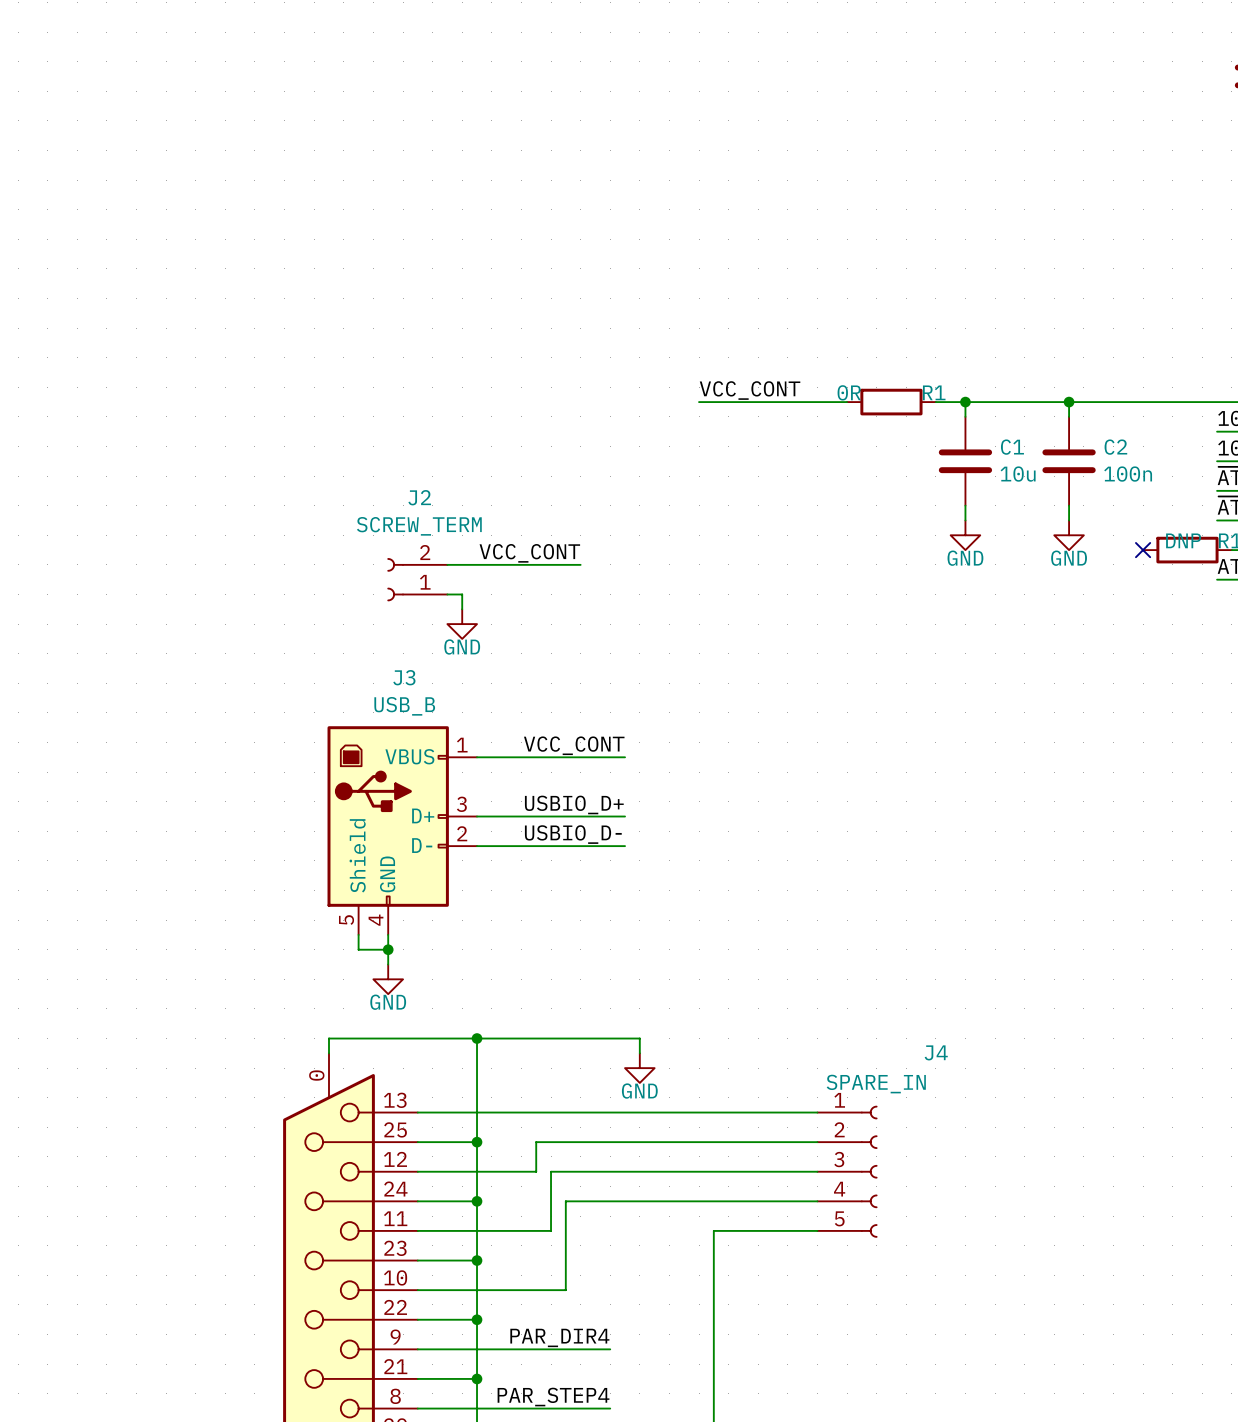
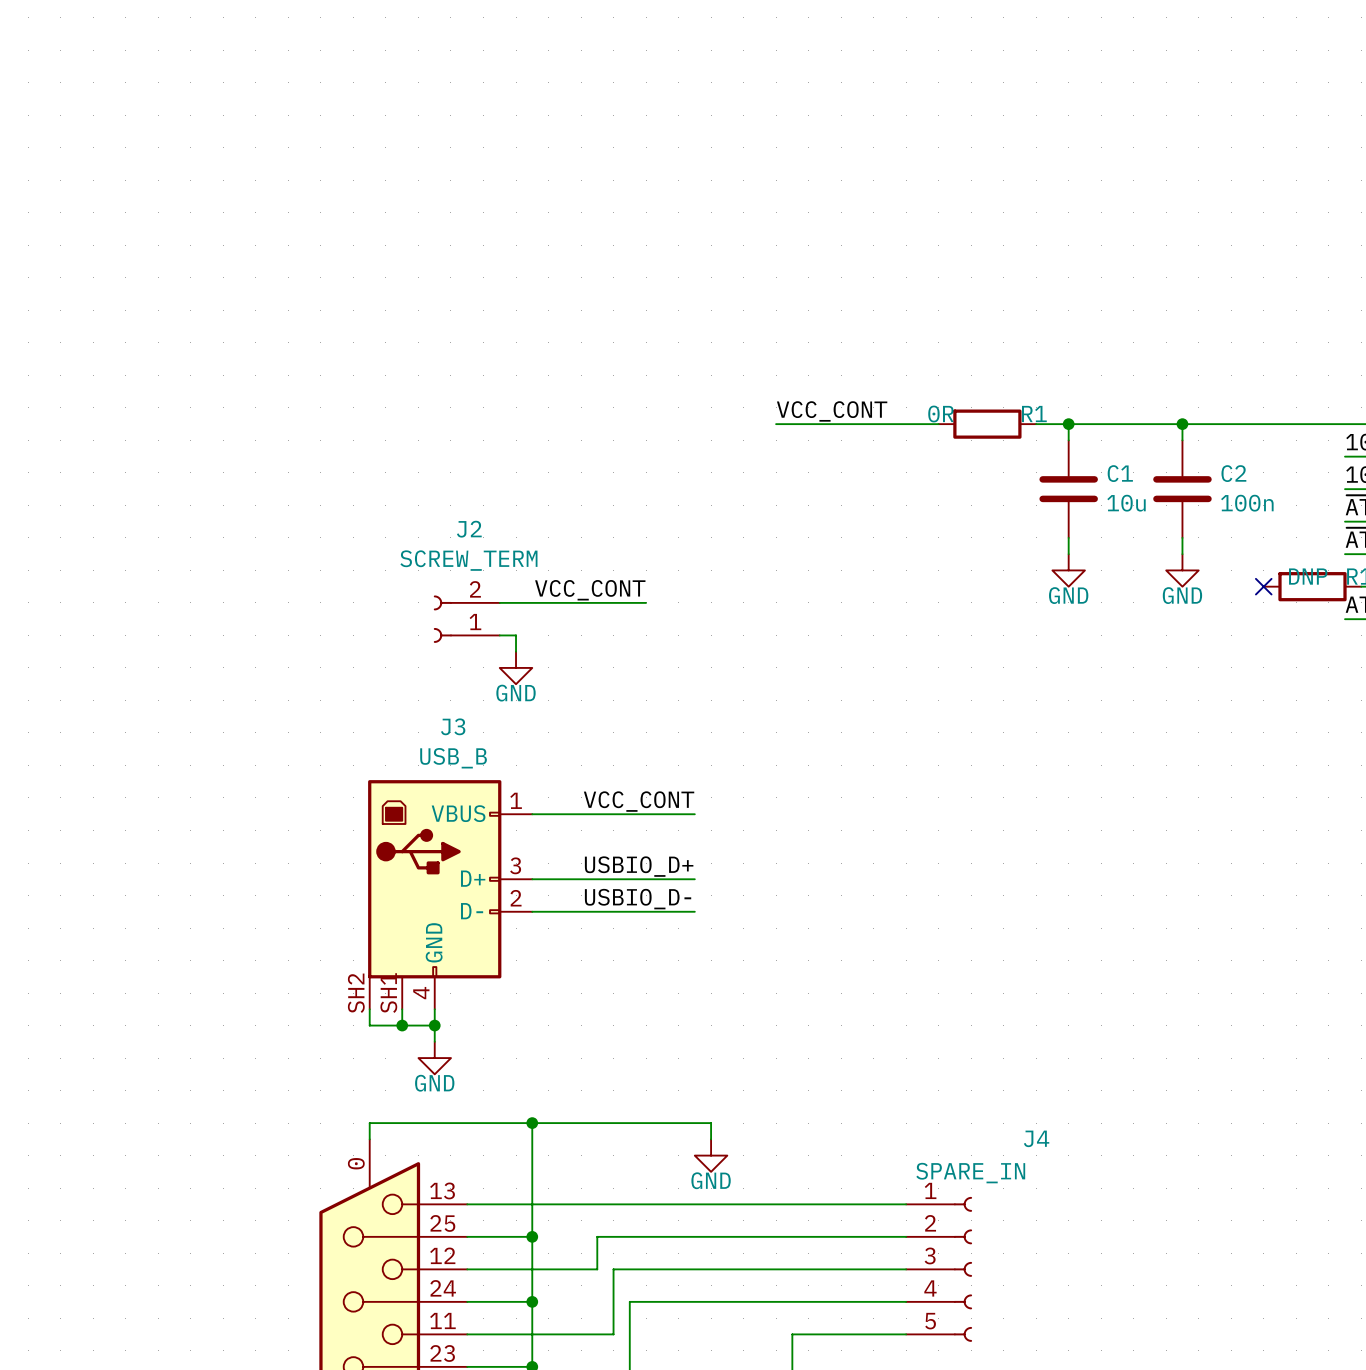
J3 symbol: [327, 726, 478, 935] -> [368, 780, 533, 1010]
wire: none -> (369, 1009) (369, 1025) (402, 1025)
junction: none -> (402, 1025)

